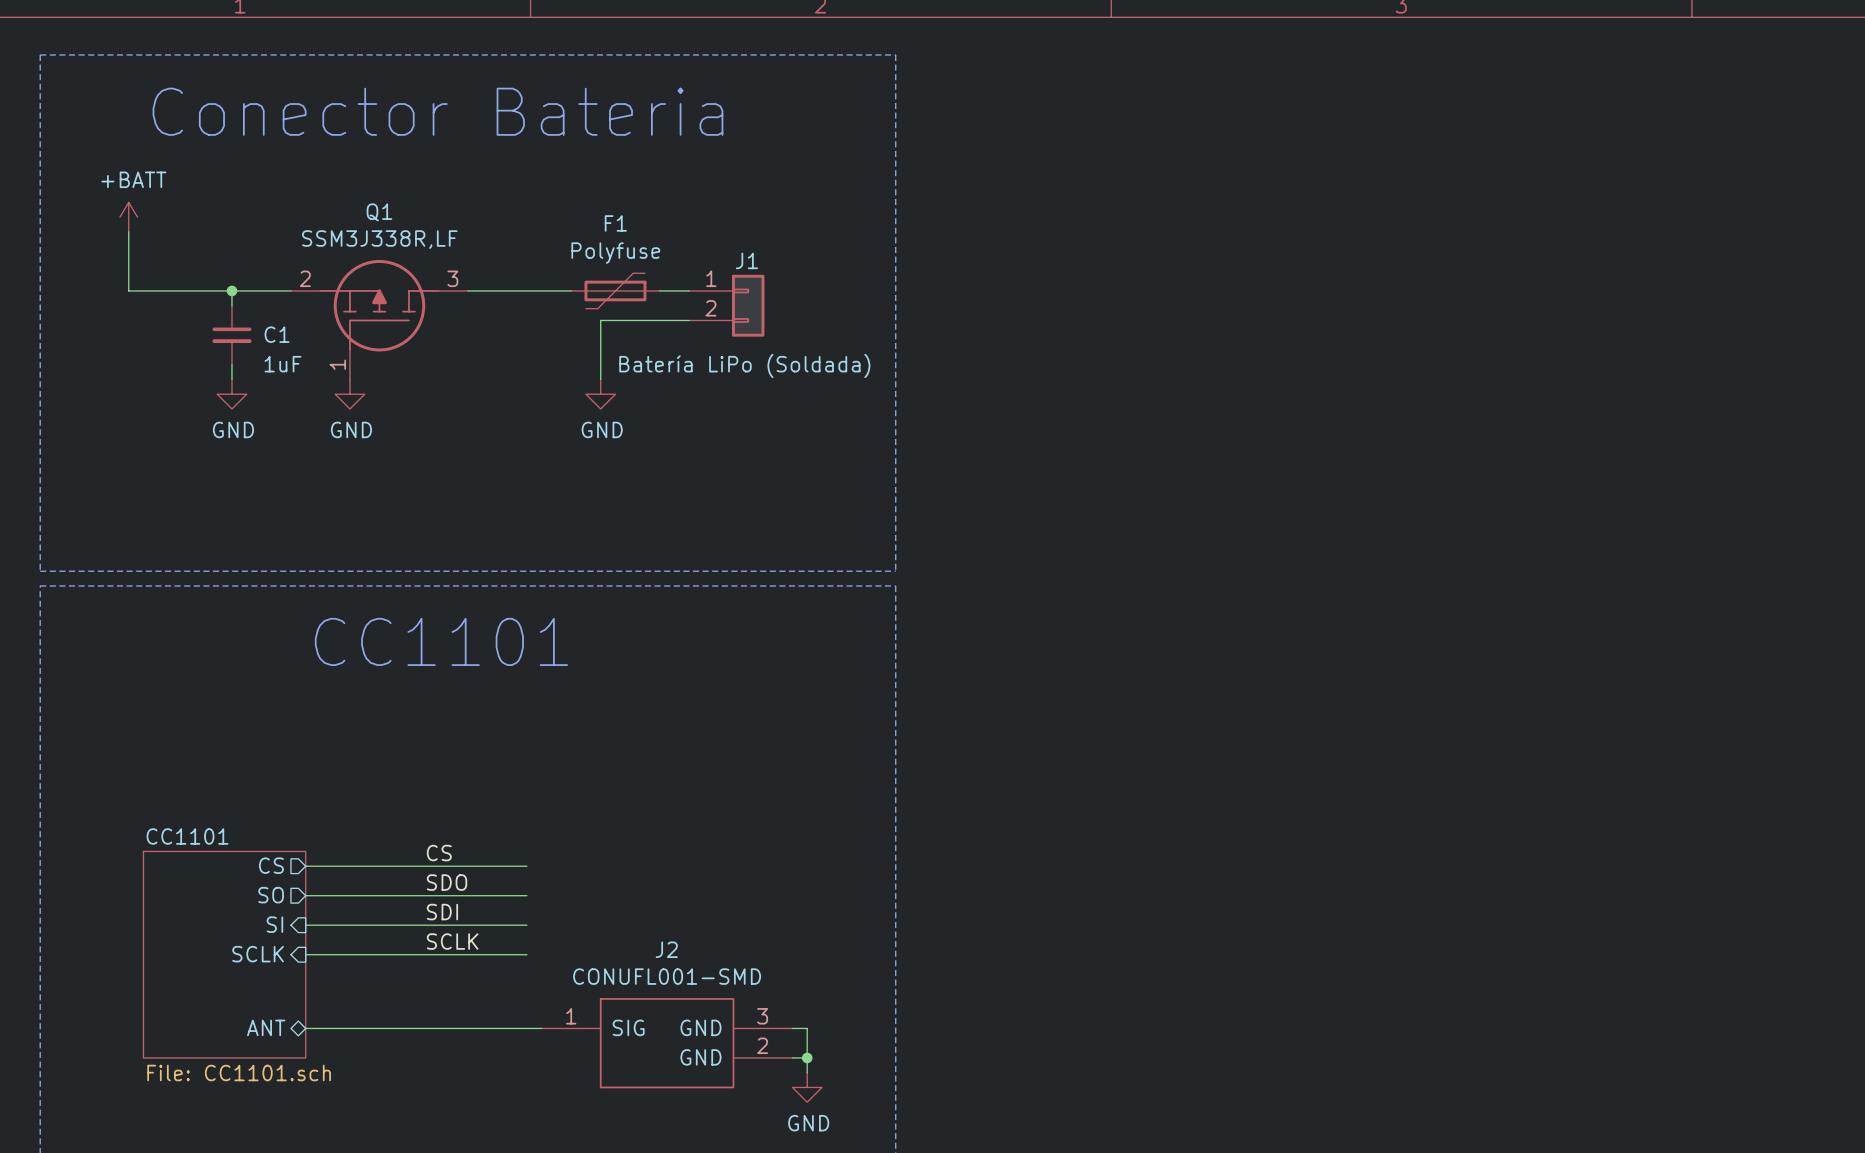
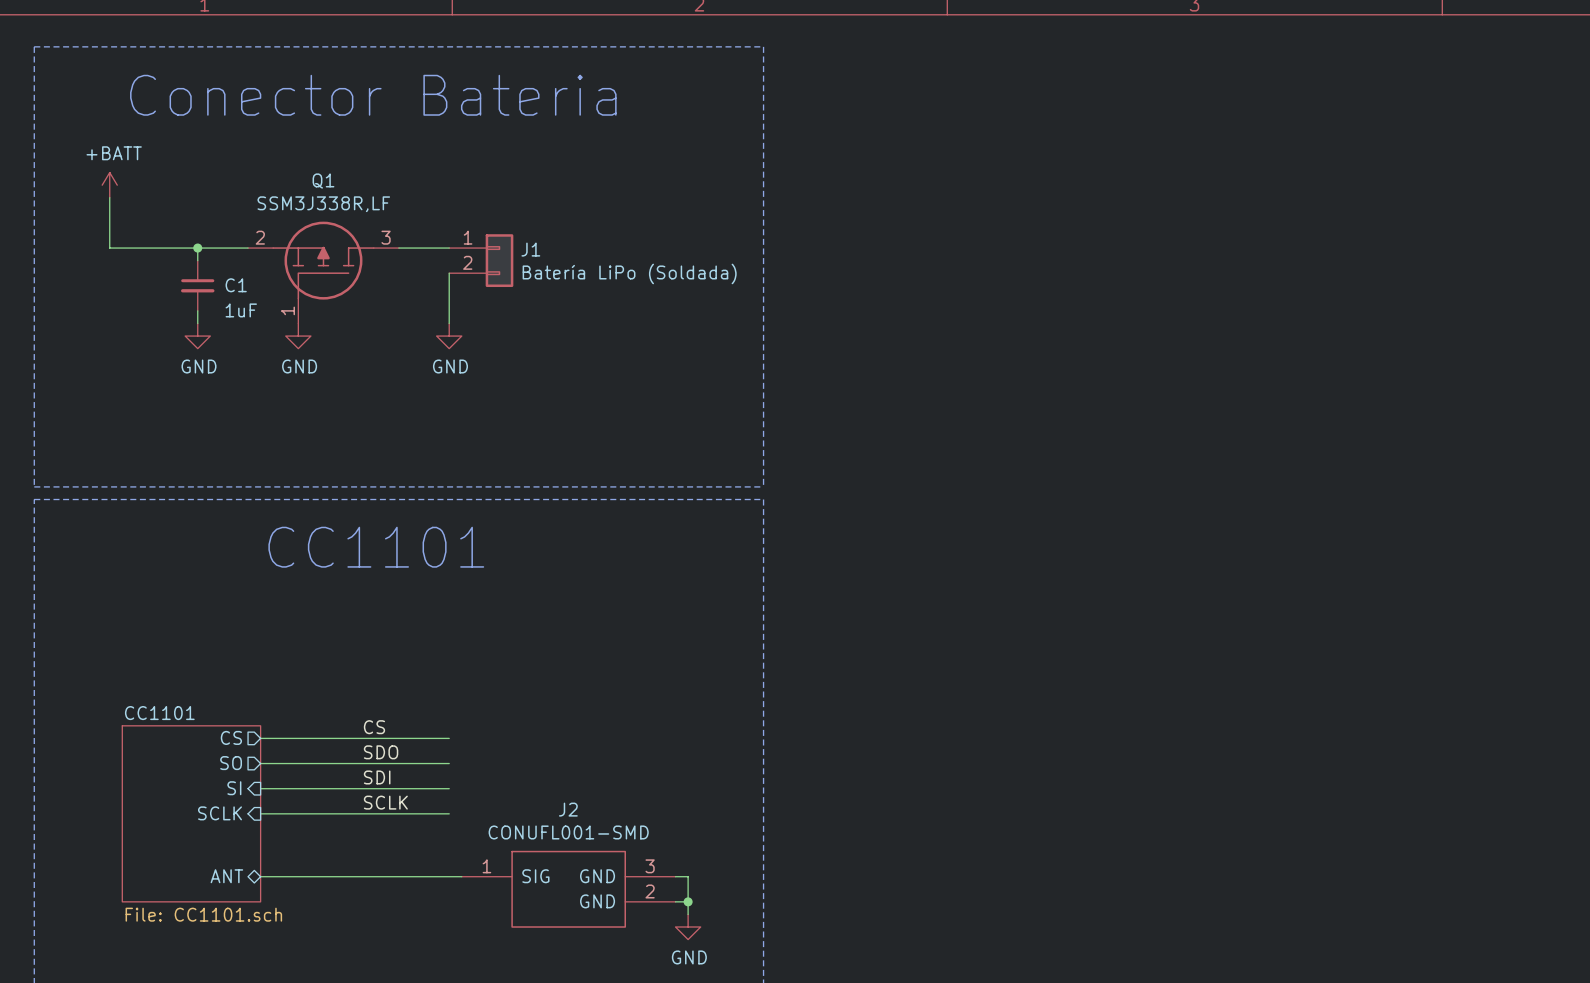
J1 name position: J1 (746, 260) -> J1 (530, 249)
F1: Polyfuse (615, 290) -> none
wire: (659, 290) (689, 290) -> none
J1 position: (726, 305) -> (481, 260)
wire: none -> (449, 273) (449, 323)
wire: (689, 320) (600, 320) (600, 379) -> none
J1 value position: Batería LiPo (Soldada) (744, 365) -> Batería LiPo (Soldada) (629, 273)
power symbol position: GND (600, 394) -> GND (449, 336)

